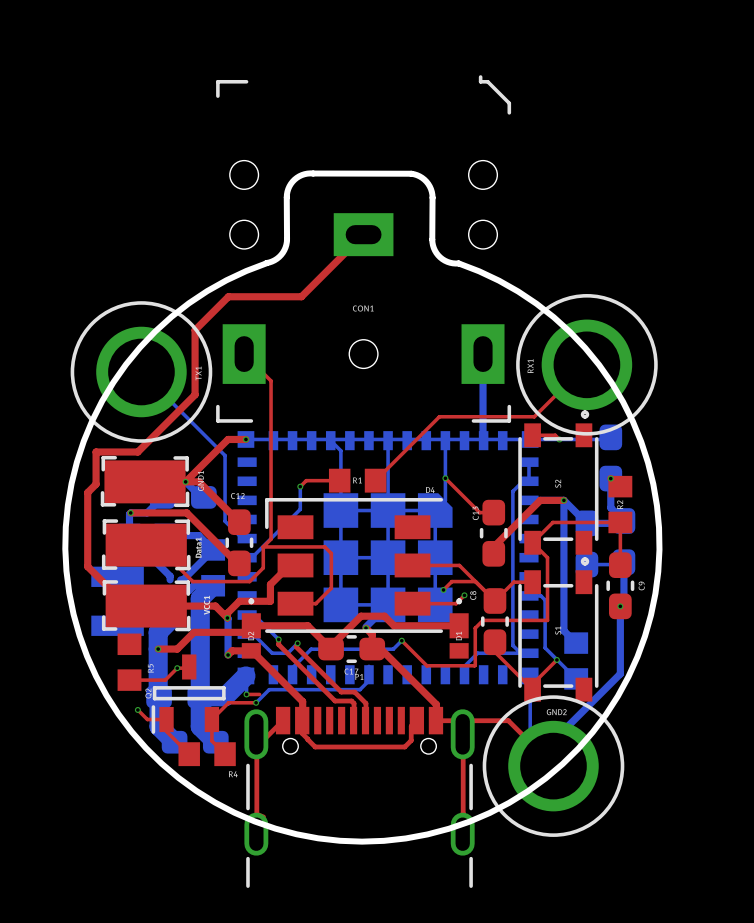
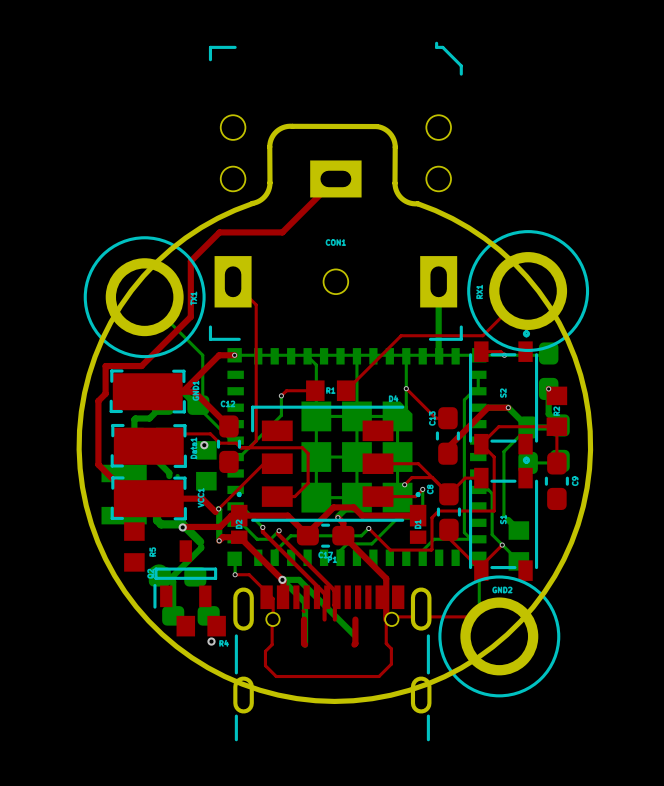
bottom track: (208, 439) (225, 455) (225, 521) -> (202, 355) (202, 411) (216, 425)
via: (185, 481) -> none
bottom track: (563, 500) (563, 630) -> (528, 427) (503, 451) (503, 515) (508, 520)
top track: (130, 512) (186, 512) (239, 563) -> none
via: (130, 512) -> none
bottom track: (165, 535) (198, 535) (213, 549) (183, 579) (180, 579) -> none
via: none -> (204, 445)
top track: (146, 545) (156, 545) (192, 581) (249, 581) (263, 567) (263, 546) -> (161, 433) (210, 433) (219, 443) (236, 443) (240, 447) (249, 447)
bottom track: (623, 562) (623, 602) (620, 606) (620, 673) (550, 743) (550, 763) -> none
top track: (295, 565) (289, 565) (270, 584) (270, 601) (239, 601) (227, 613) (227, 618) (215, 606) (208, 606) -> (263, 463) (215, 512) (202, 498)
bottom track: (179, 590) (189, 590) (194, 585) (213, 585) (200, 598) (200, 726) (215, 742) -> none
bottom track: none -> (422, 489) (422, 513) (418, 518) (397, 518) (371, 543) (347, 543) (340, 550)
via: (620, 606) -> none
bottom track: none -> (148, 502) (157, 511) (157, 520) (161, 524) (182, 524) (200, 541)
bottom track: (176, 614) (158, 632) (159, 726) (174, 742) -> (201, 546) (170, 578) (173, 581) (173, 615)
top track: (251, 625) (244, 632) (194, 632) (177, 649) (158, 649) -> (239, 515) (231, 515) (220, 526) (182, 527)
via: none -> (182, 527)
via: (158, 649) -> none
top track: (372, 649) (380, 649) (436, 704) (436, 720) (508, 720) (551, 763) -> (343, 535) (386, 578) (386, 619)
top track: (189, 666) (177, 668) (165, 680) (129, 680) -> none
via: (177, 668) -> none
bottom track: (368, 674) (368, 680) (360, 689) (269, 689) (256, 702) -> none
bottom track: (245, 675) (225, 696) (200, 696) -> none
top track: (341, 692) (354, 692) (365, 703) (365, 720) -> (316, 572) (334, 590) (334, 619)
top track: none -> (246, 574) (249, 574) (273, 598) (272, 644) (265, 651) (265, 665) (276, 676) (379, 676) (391, 664) (391, 648) (386, 643) (386, 619)
via: none -> (282, 579)
top track: (335, 701) (351, 701) (354, 703) (354, 720) -> (311, 580) (325, 594) (324, 619)
top track: (256, 702) (228, 702) (211, 719) (211, 741) (225, 754) -> none
via: (256, 702) -> none
top track: (137, 709) (147, 719) (166, 719) (166, 731) (189, 754) -> none
via: (137, 709) -> none
top track: (283, 720) (256, 746) (256, 814) (263, 816) -> none
top track: (302, 720) (302, 733) (315, 746) (404, 746) (411, 740) (411, 726) (416, 720) -> none
top track: (463, 734) (463, 813) (458, 818) -> none
top track: none -> (302, 610) (304, 611)
top track: none -> (469, 616) (388, 616) (386, 619)
top track: none -> (304, 619) (305, 644)
top track: none -> (355, 619) (354, 644)
via: none -> (211, 641)
bottom track: none -> (305, 644) (305, 602) (282, 579) (299, 579) (354, 635) (354, 644)

